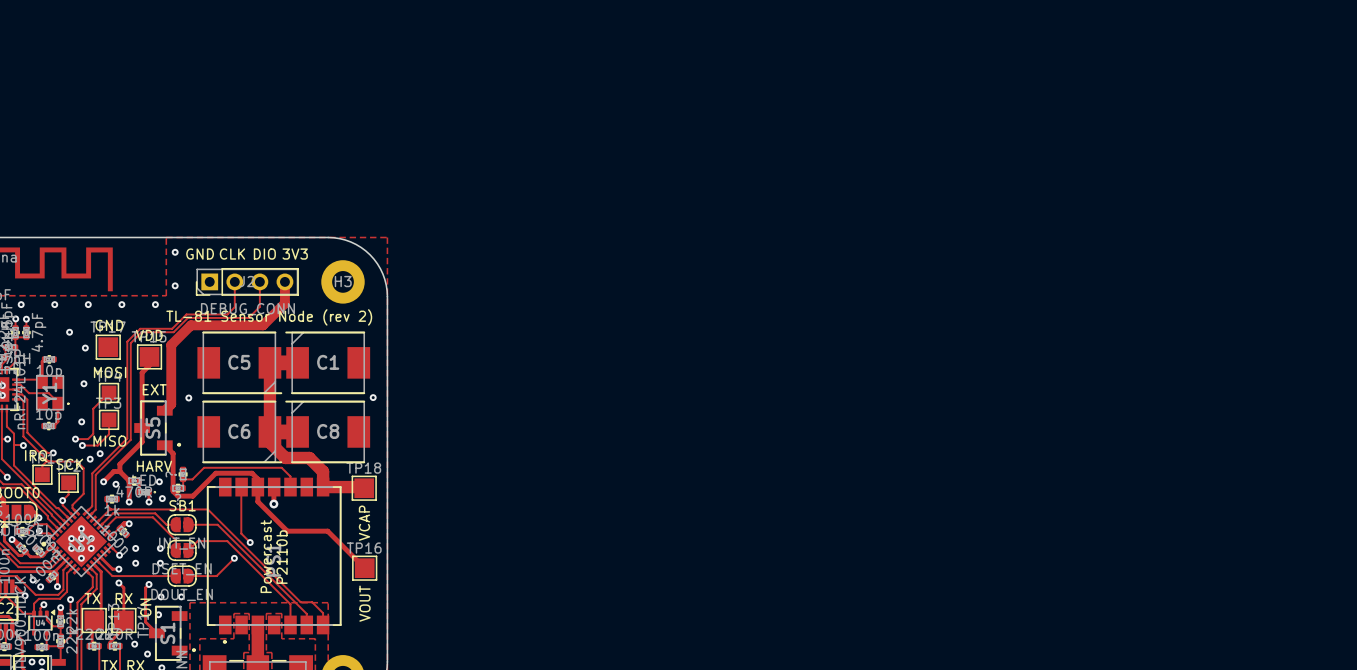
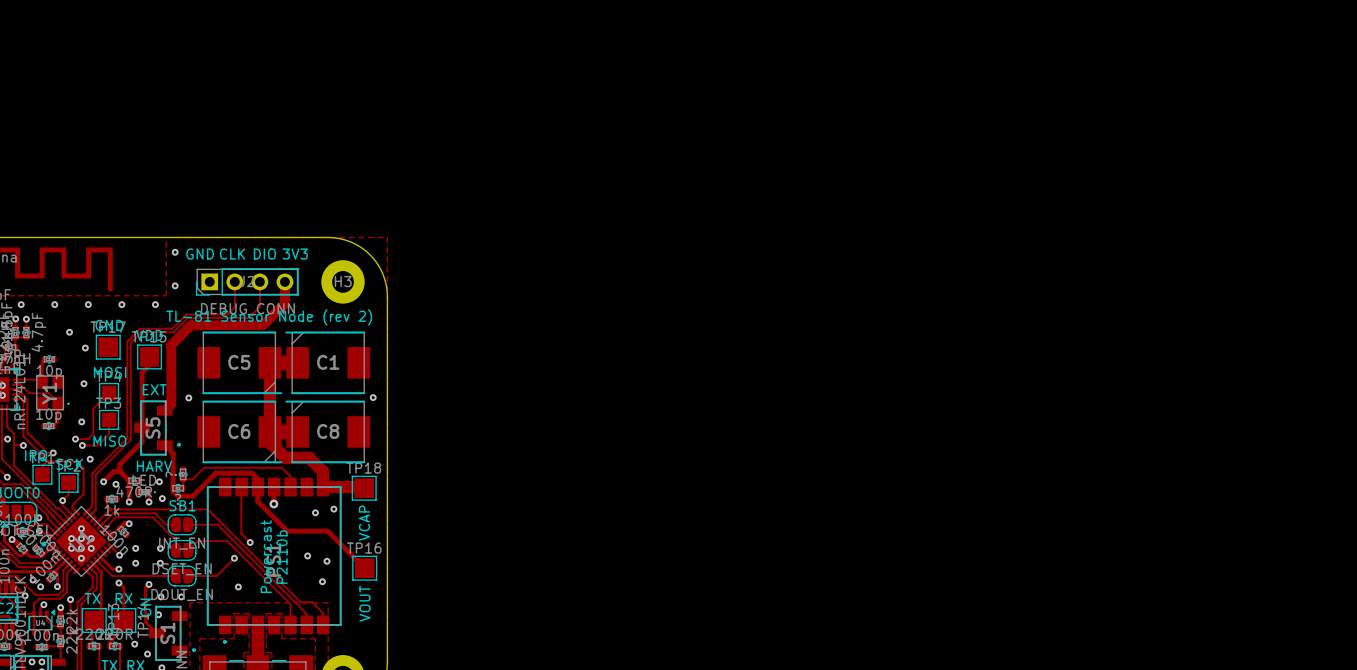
via: (100, 453) -> none
via: none -> (333, 509)
via: none -> (315, 512)
via: none -> (307, 555)
via: none -> (327, 561)
via: none -> (322, 581)
via: none -> (238, 587)

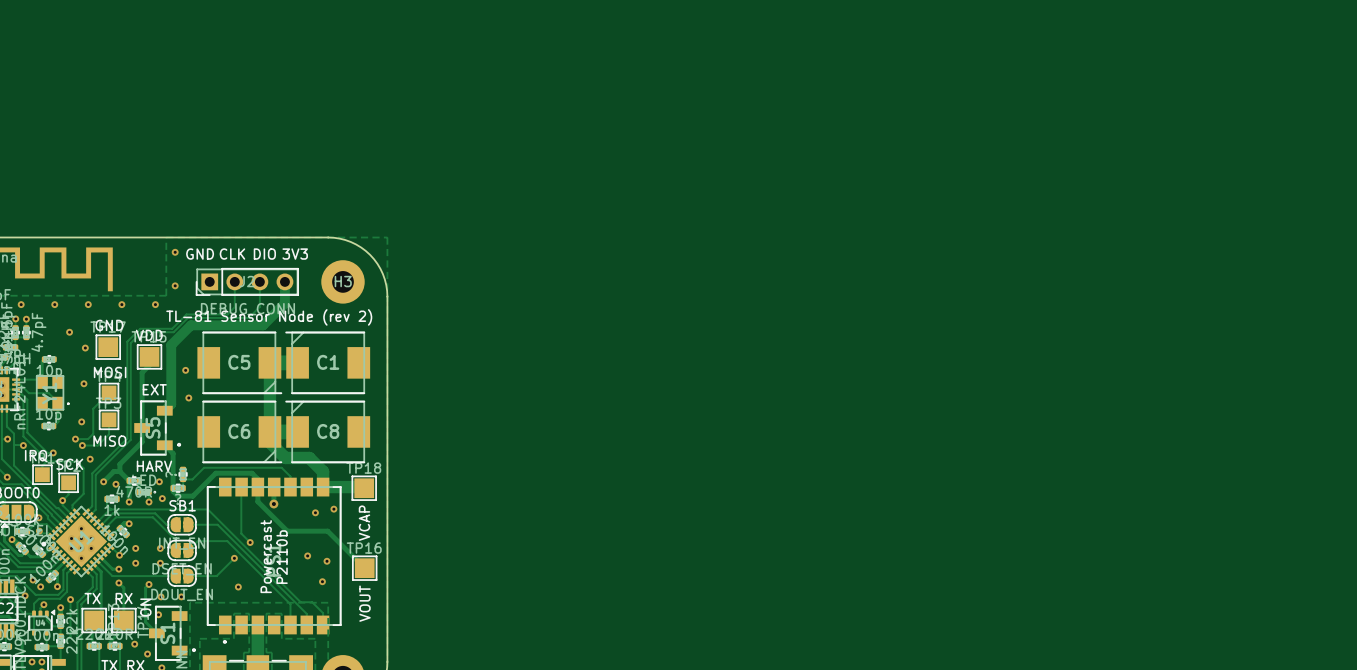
via: none -> (185, 370)
via: (373, 397) -> none

